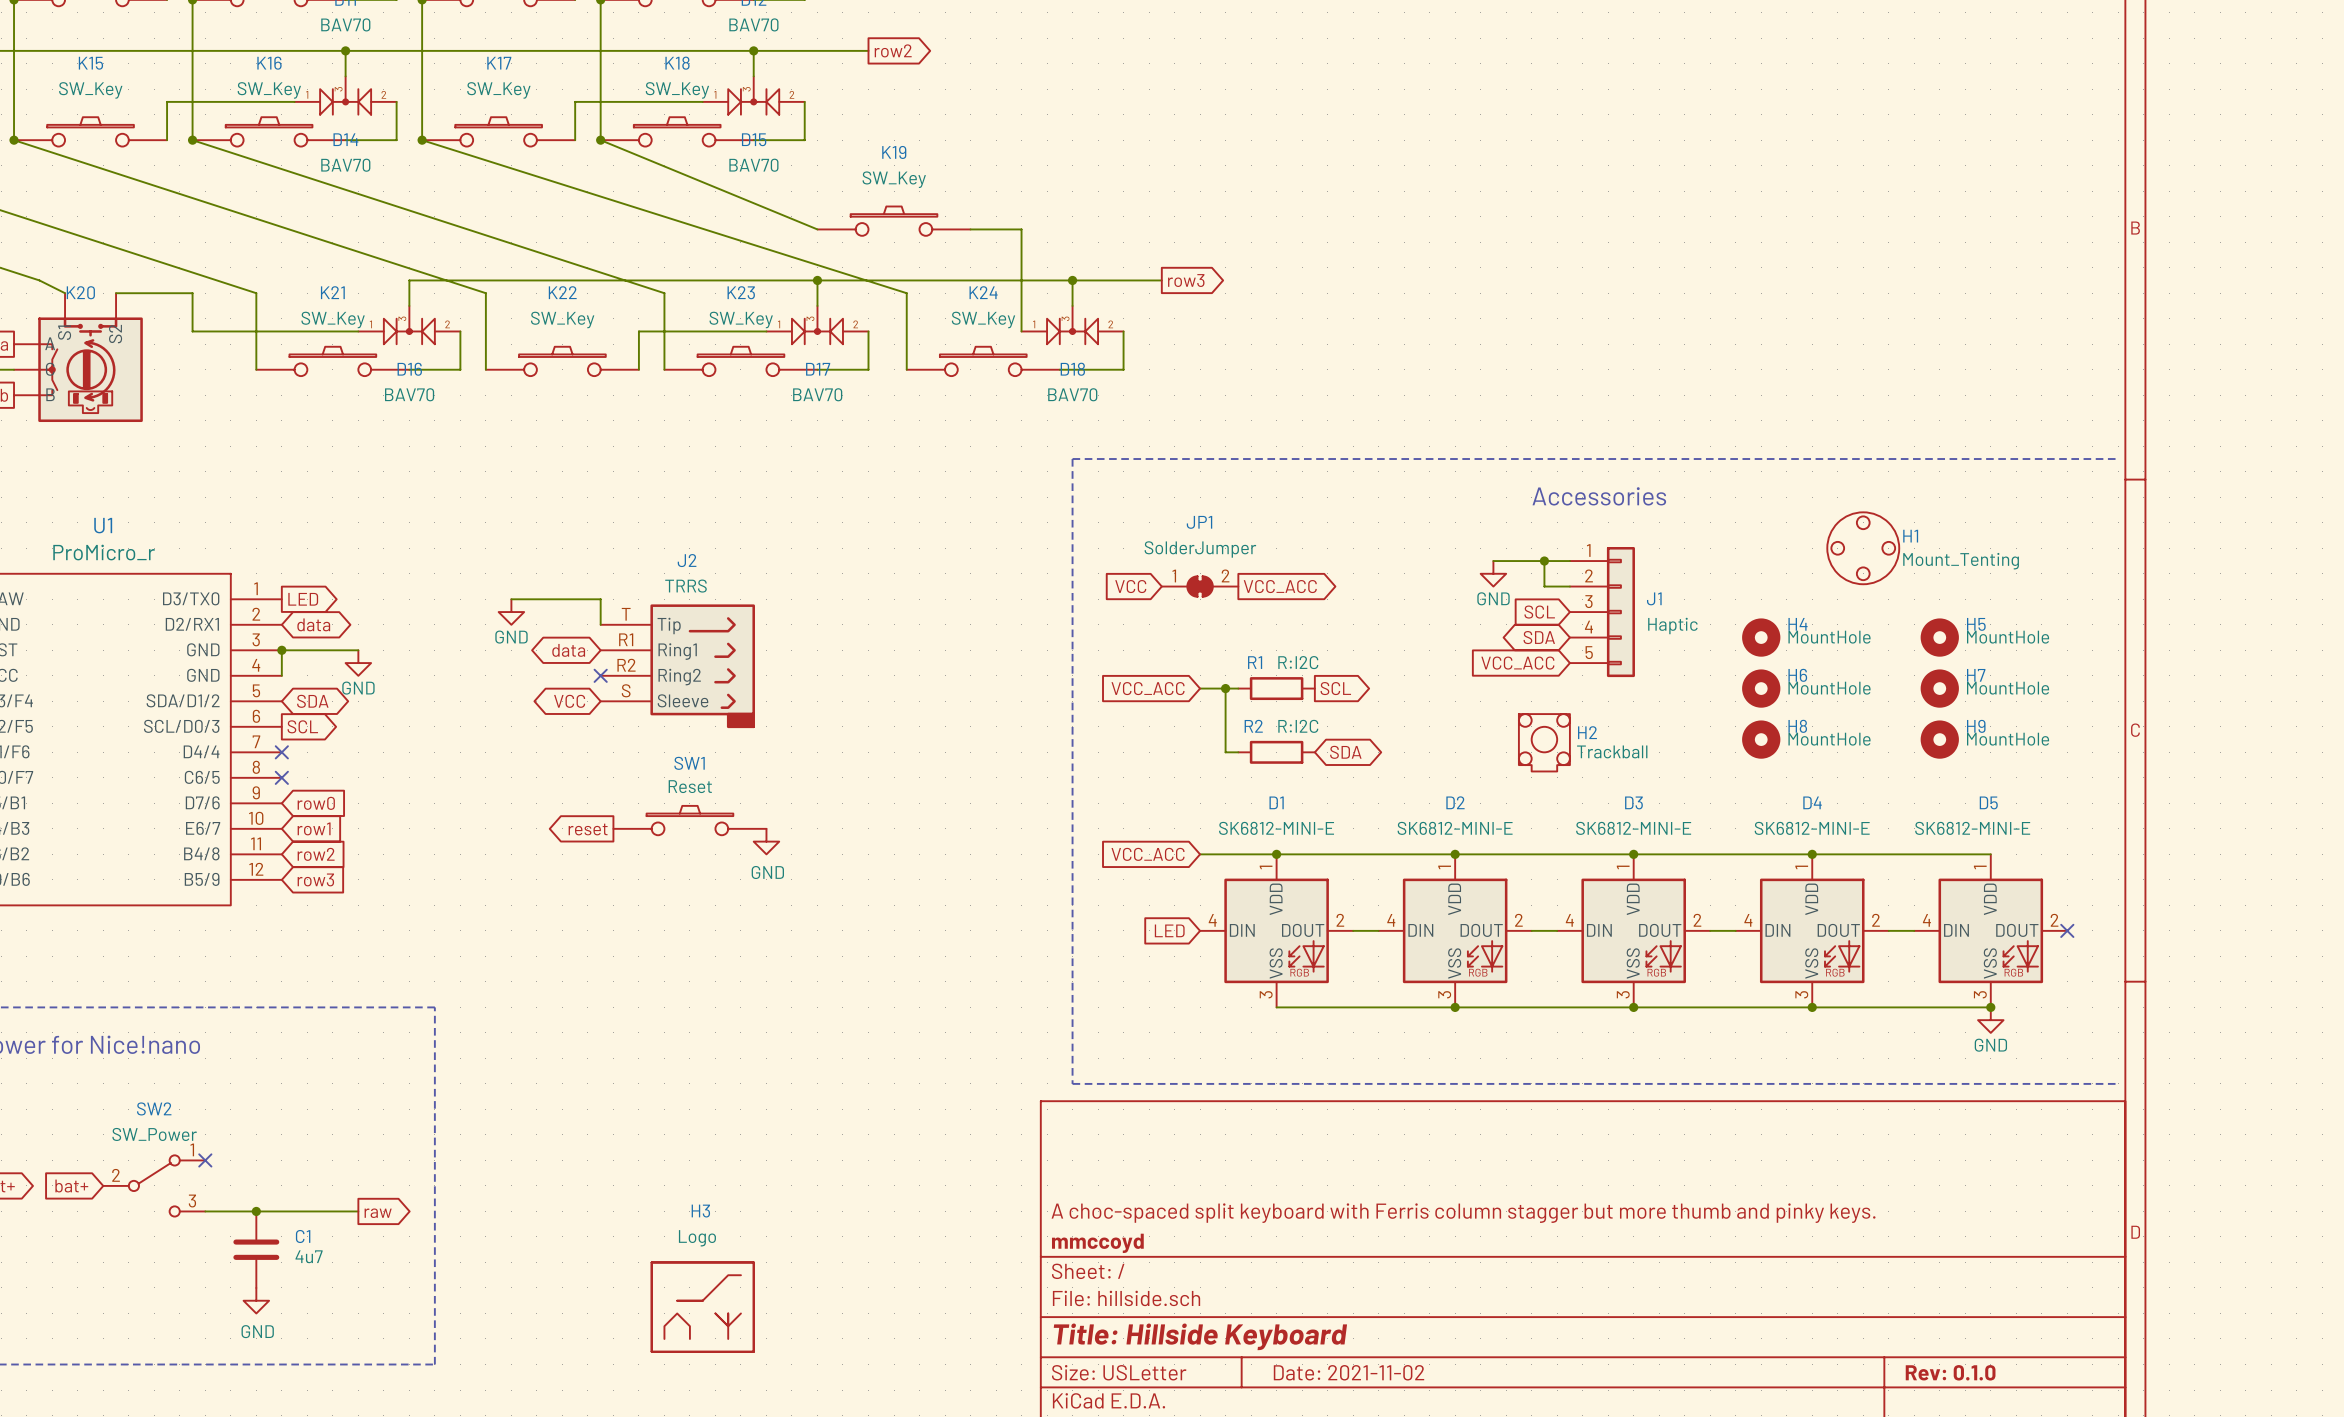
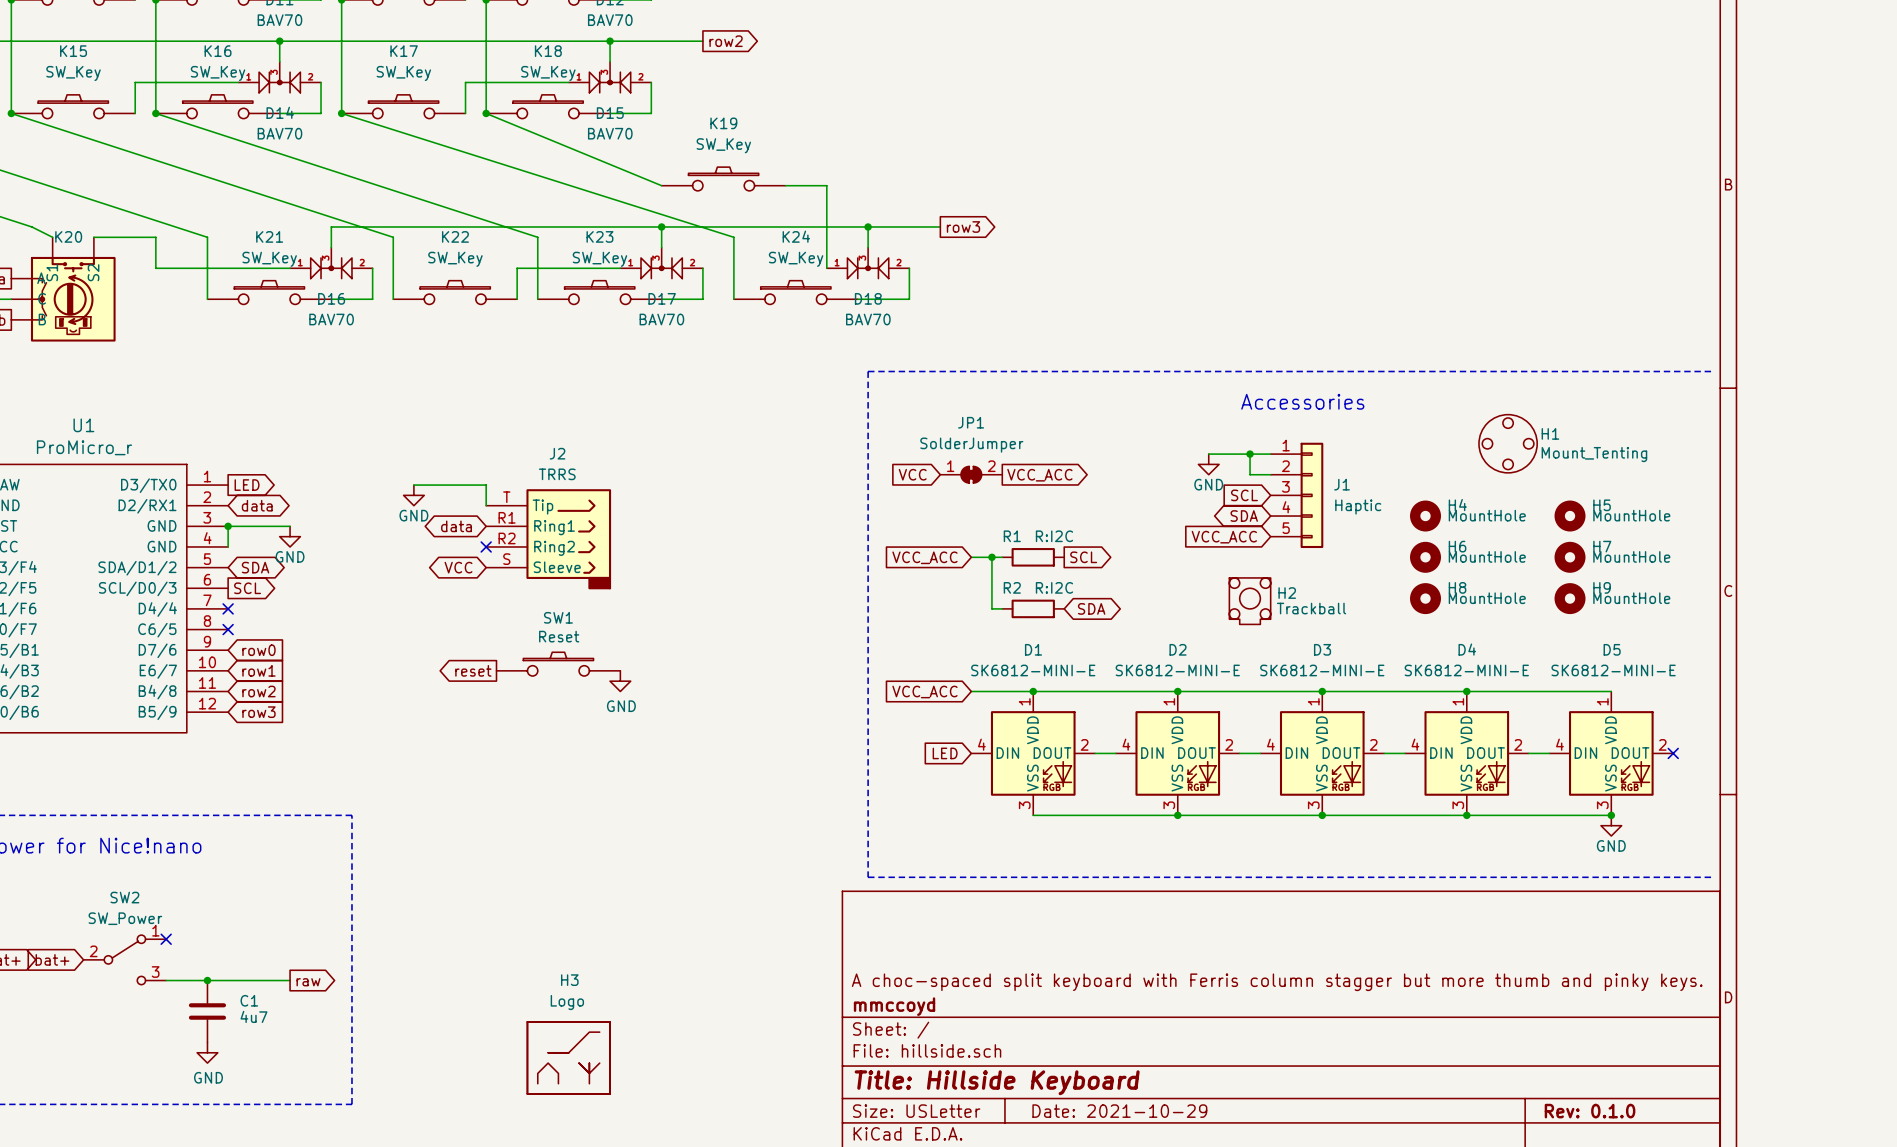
title block: Date: 2021-11-02 (1349, 1372) -> Date: 2021-10-29 (1119, 1111)

